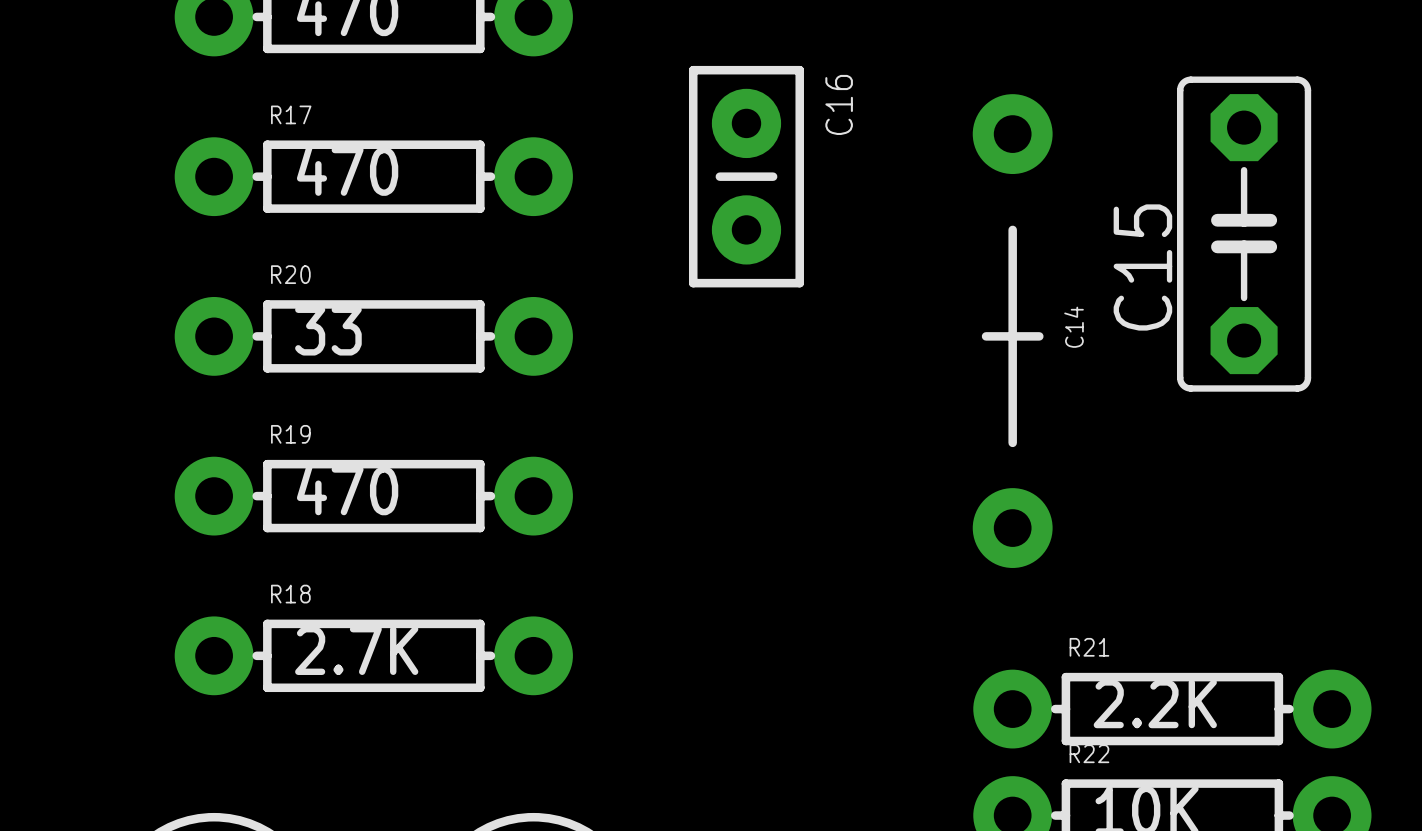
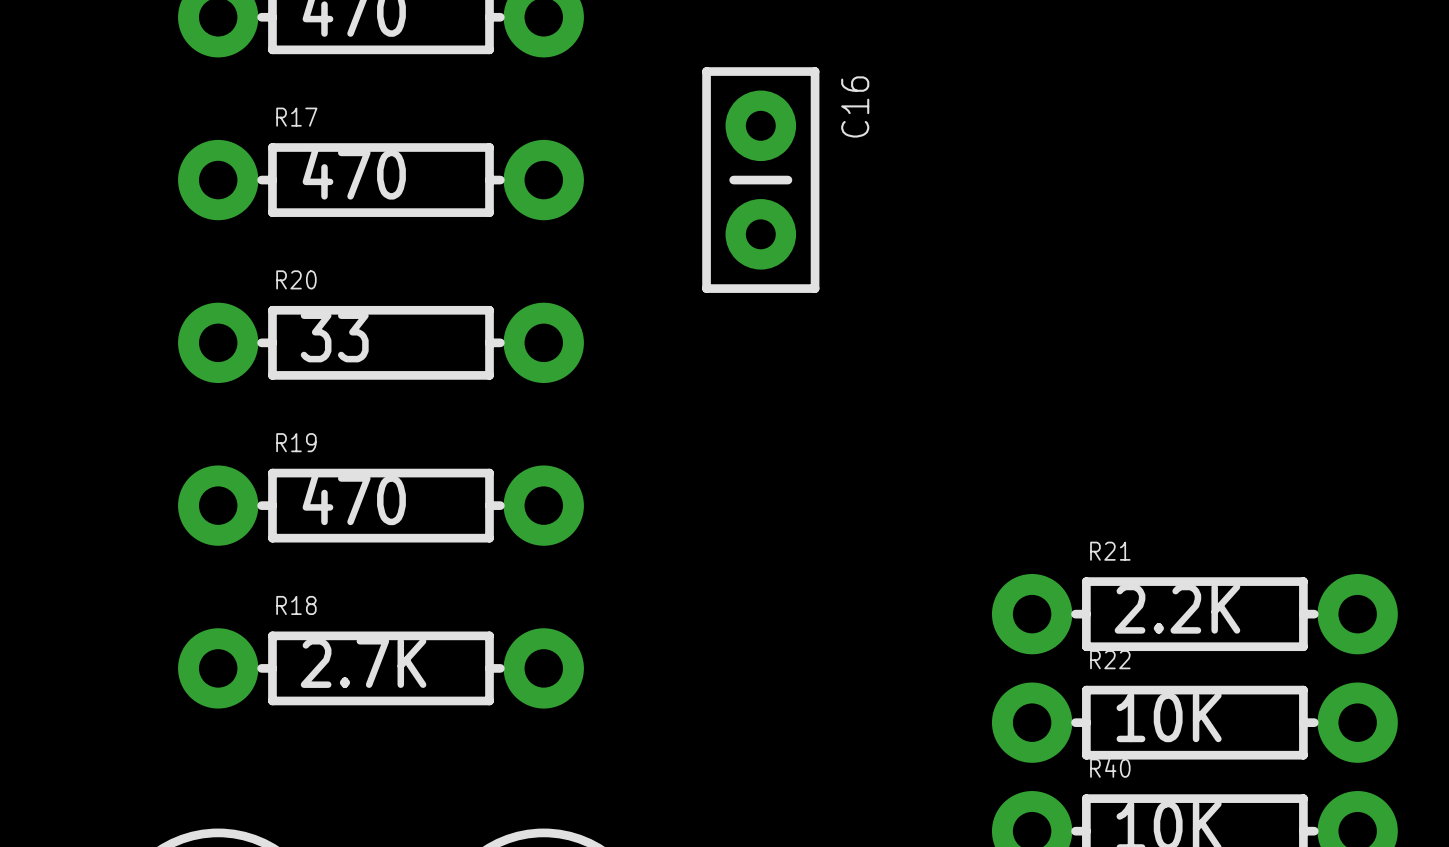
C15: (1244, 234) -> none
C14: (1012, 331) -> none
R21: none -> 2.2K (1194, 614)
R21 name: R21 (1089, 647) -> R22 (1110, 659)
R21 value: 2.2K (1155, 703) -> 10K (1169, 717)
R22 name: R22 (1089, 753) -> R40 (1110, 767)

